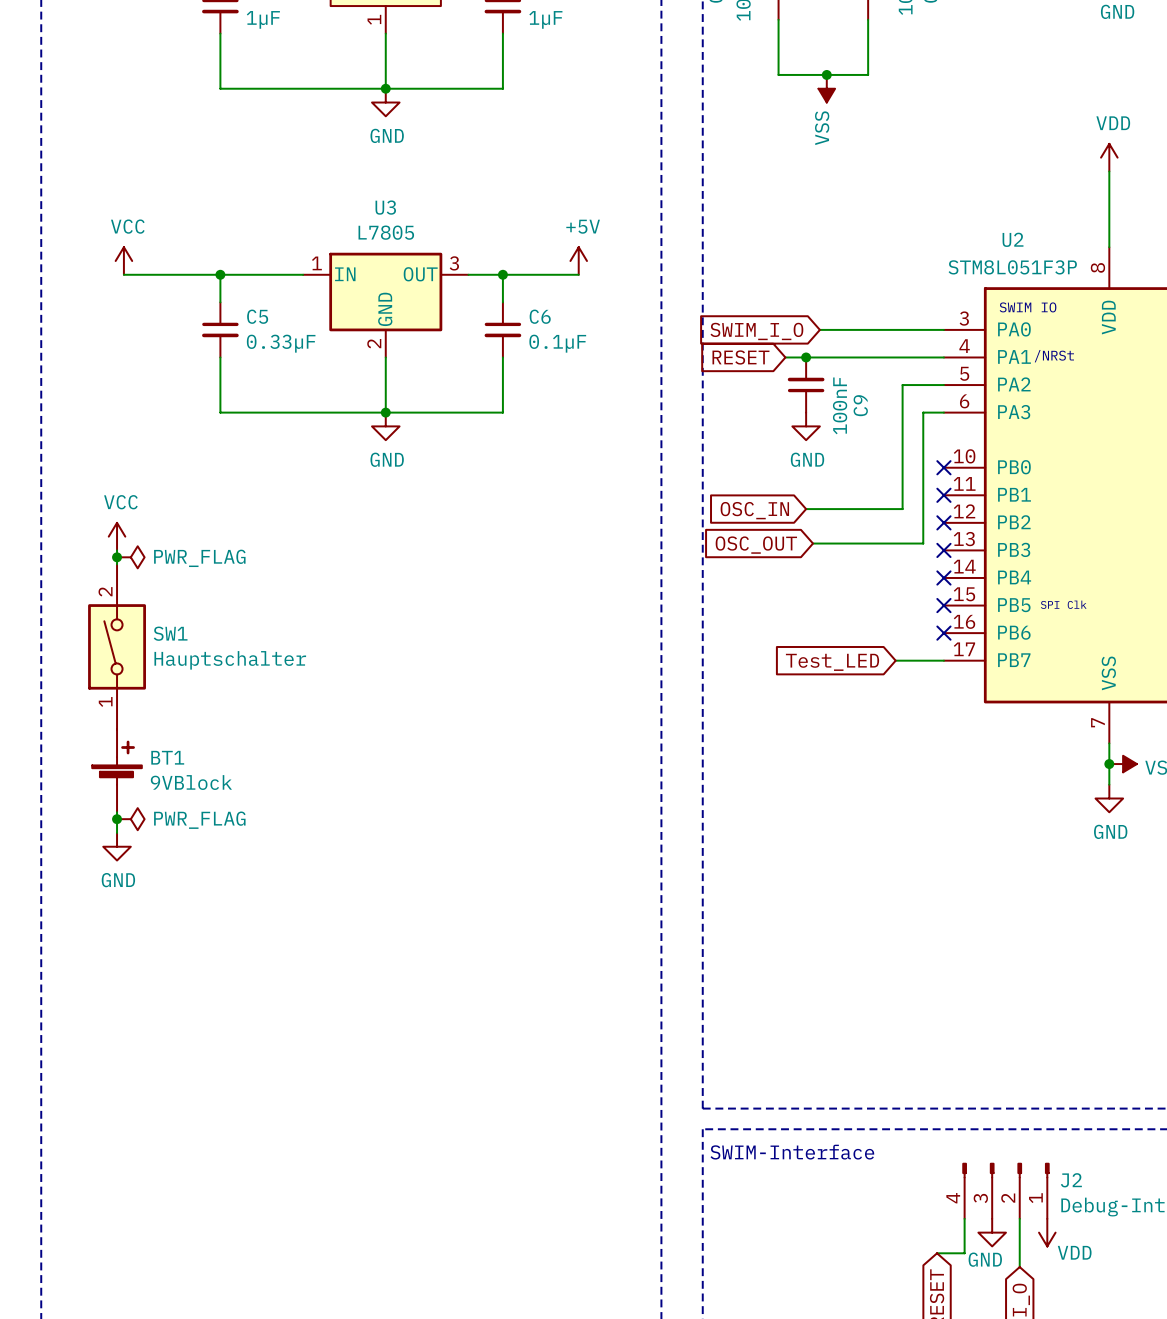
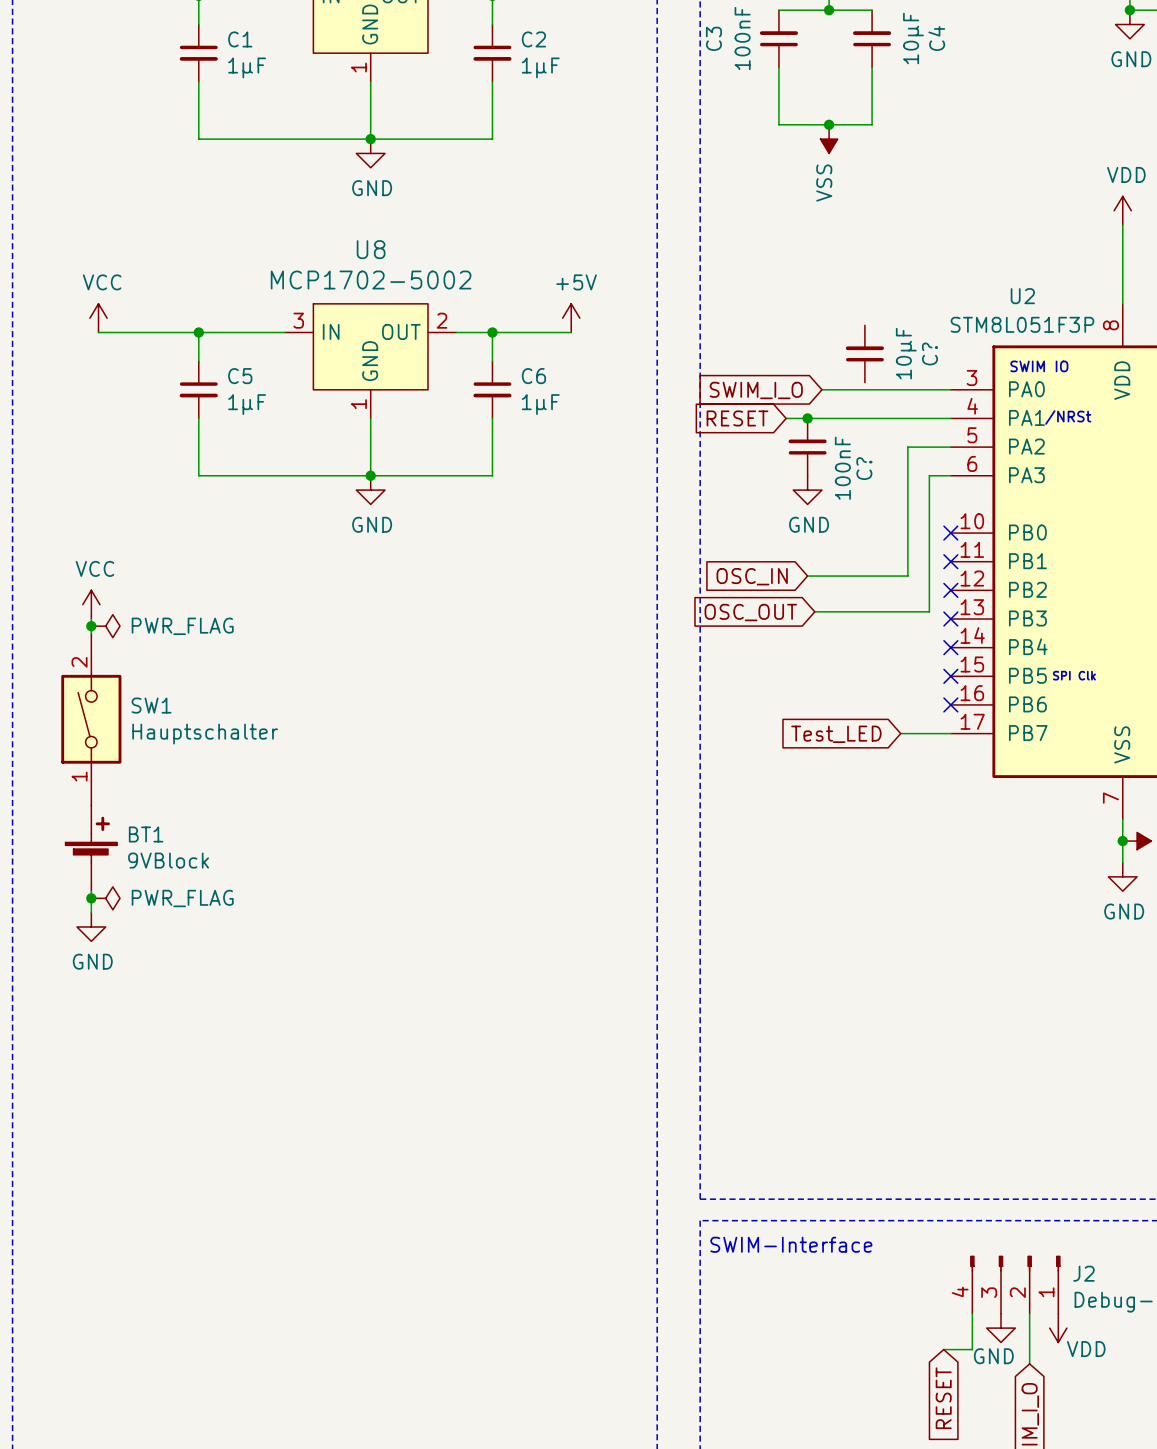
C?: none -> 10µF (864, 353)
U8: none -> MCP1702-5002 (370, 361)
U3: L7805 (385, 305) -> none
C5 value: 0.33µF (281, 343) -> 1µF (247, 404)
C6 value: 0.1µF (557, 343) -> 1µF (540, 404)
C9 name: C9 (860, 405) -> C? (864, 468)

